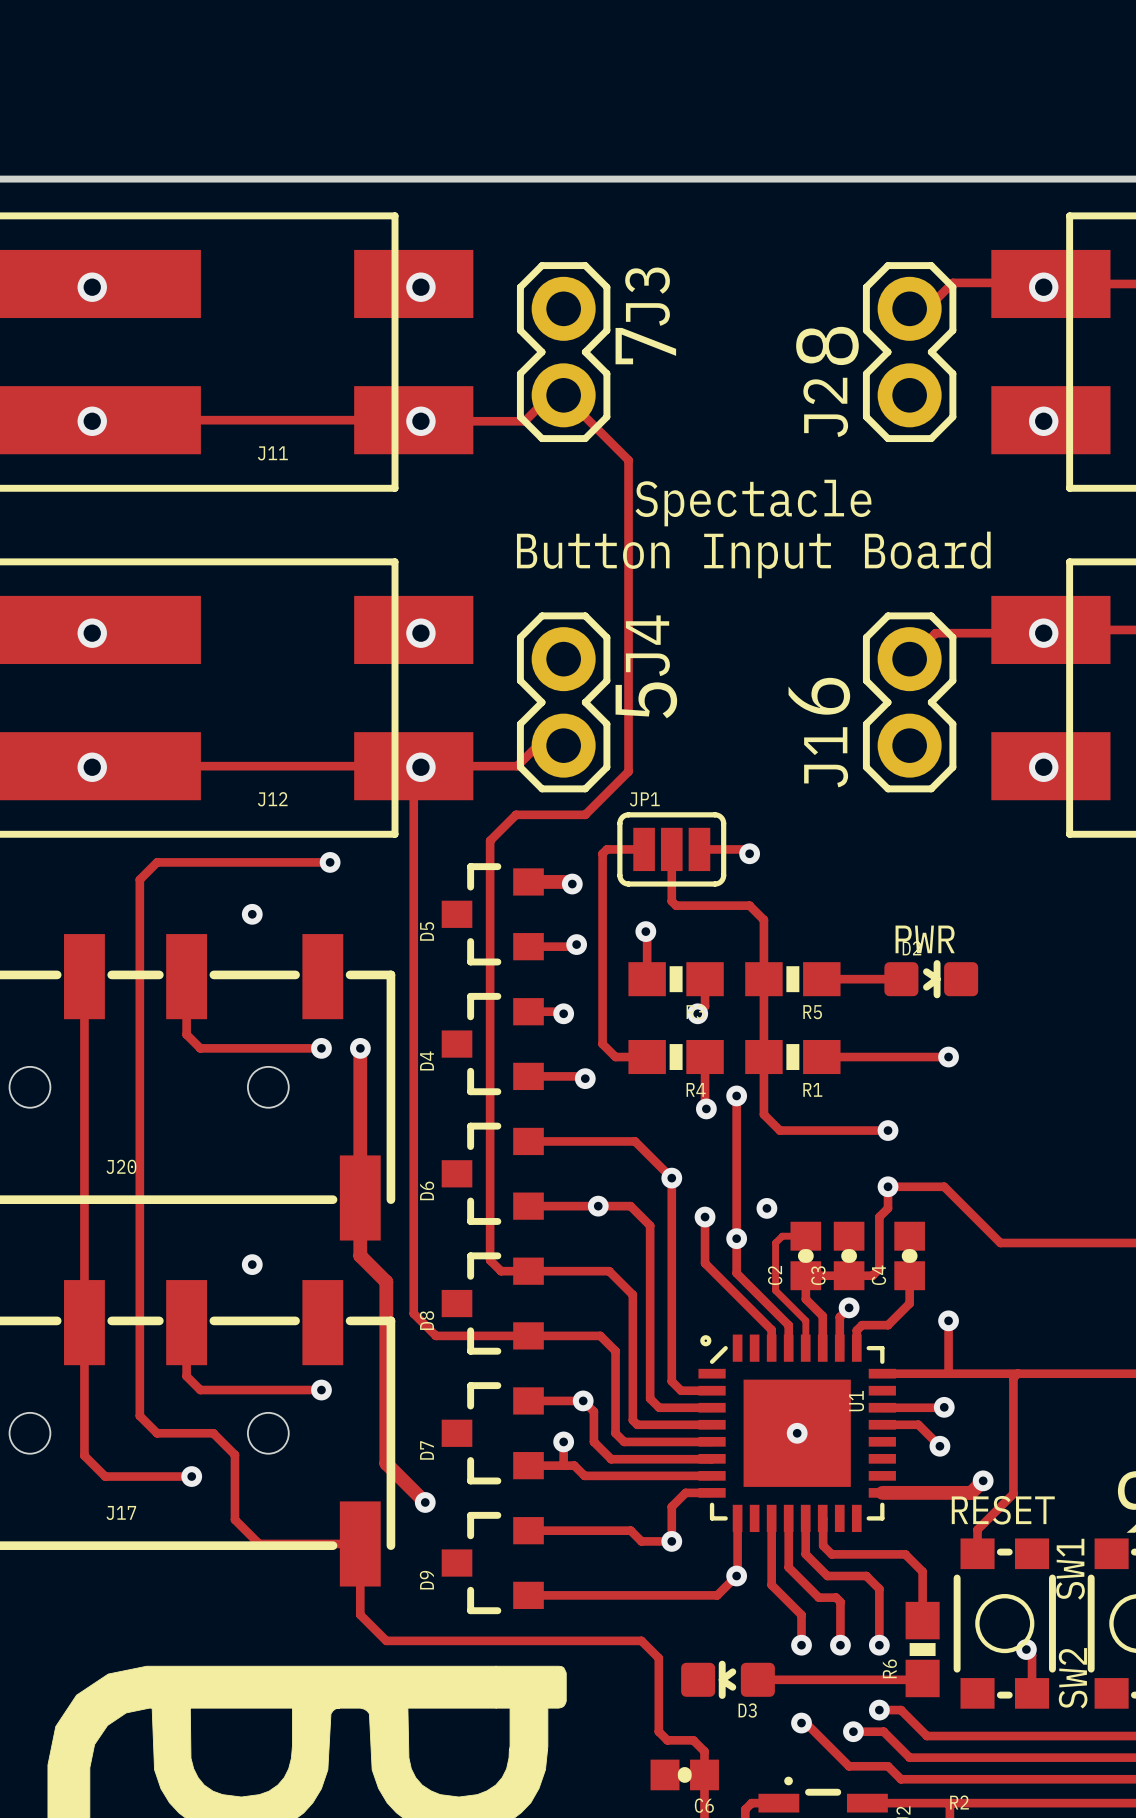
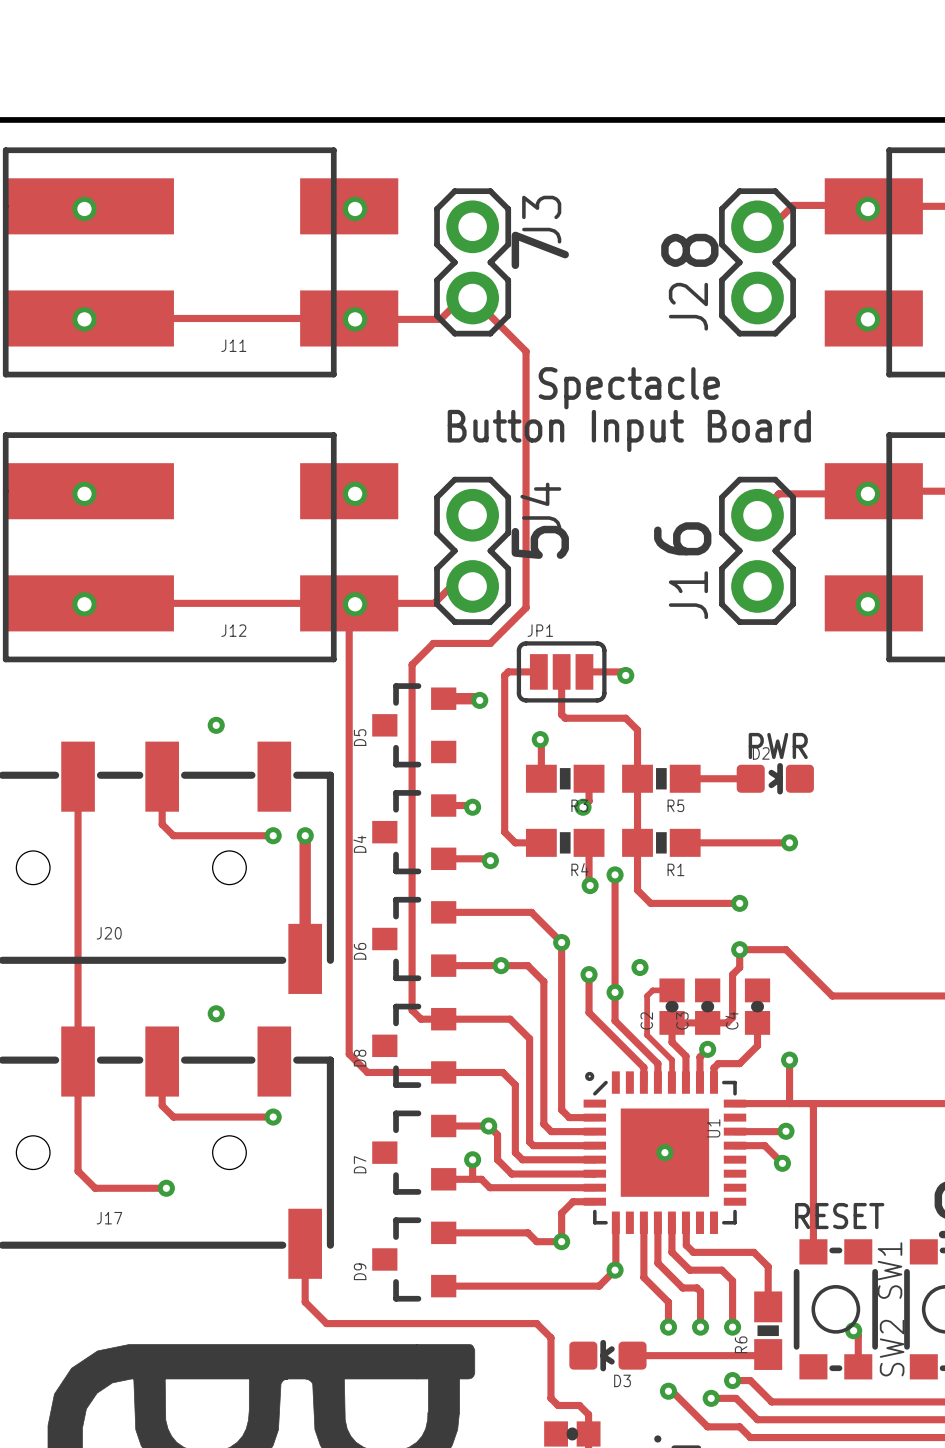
track: (330, 862) (157, 862) (139, 879) (139, 1415) (157, 1433) (213, 1433) (234, 1454) (234, 1519) (259, 1543) (360, 1543) -> none
via: (330, 862) -> none
track: (576, 944) (574, 946) (528, 946) -> none
via: (576, 944) -> none
track: (360, 1197) (360, 1255) (386, 1281) (386, 1463) (425, 1502) -> none
track: (1017, 1373) (1013, 1378) (1013, 1493) (977, 1529) -> (810, 1103) (813, 1106) (813, 1232)
track: (983, 1480) (971, 1492) (882, 1492) -> none
via: (983, 1480) -> none
via: (425, 1502) -> none

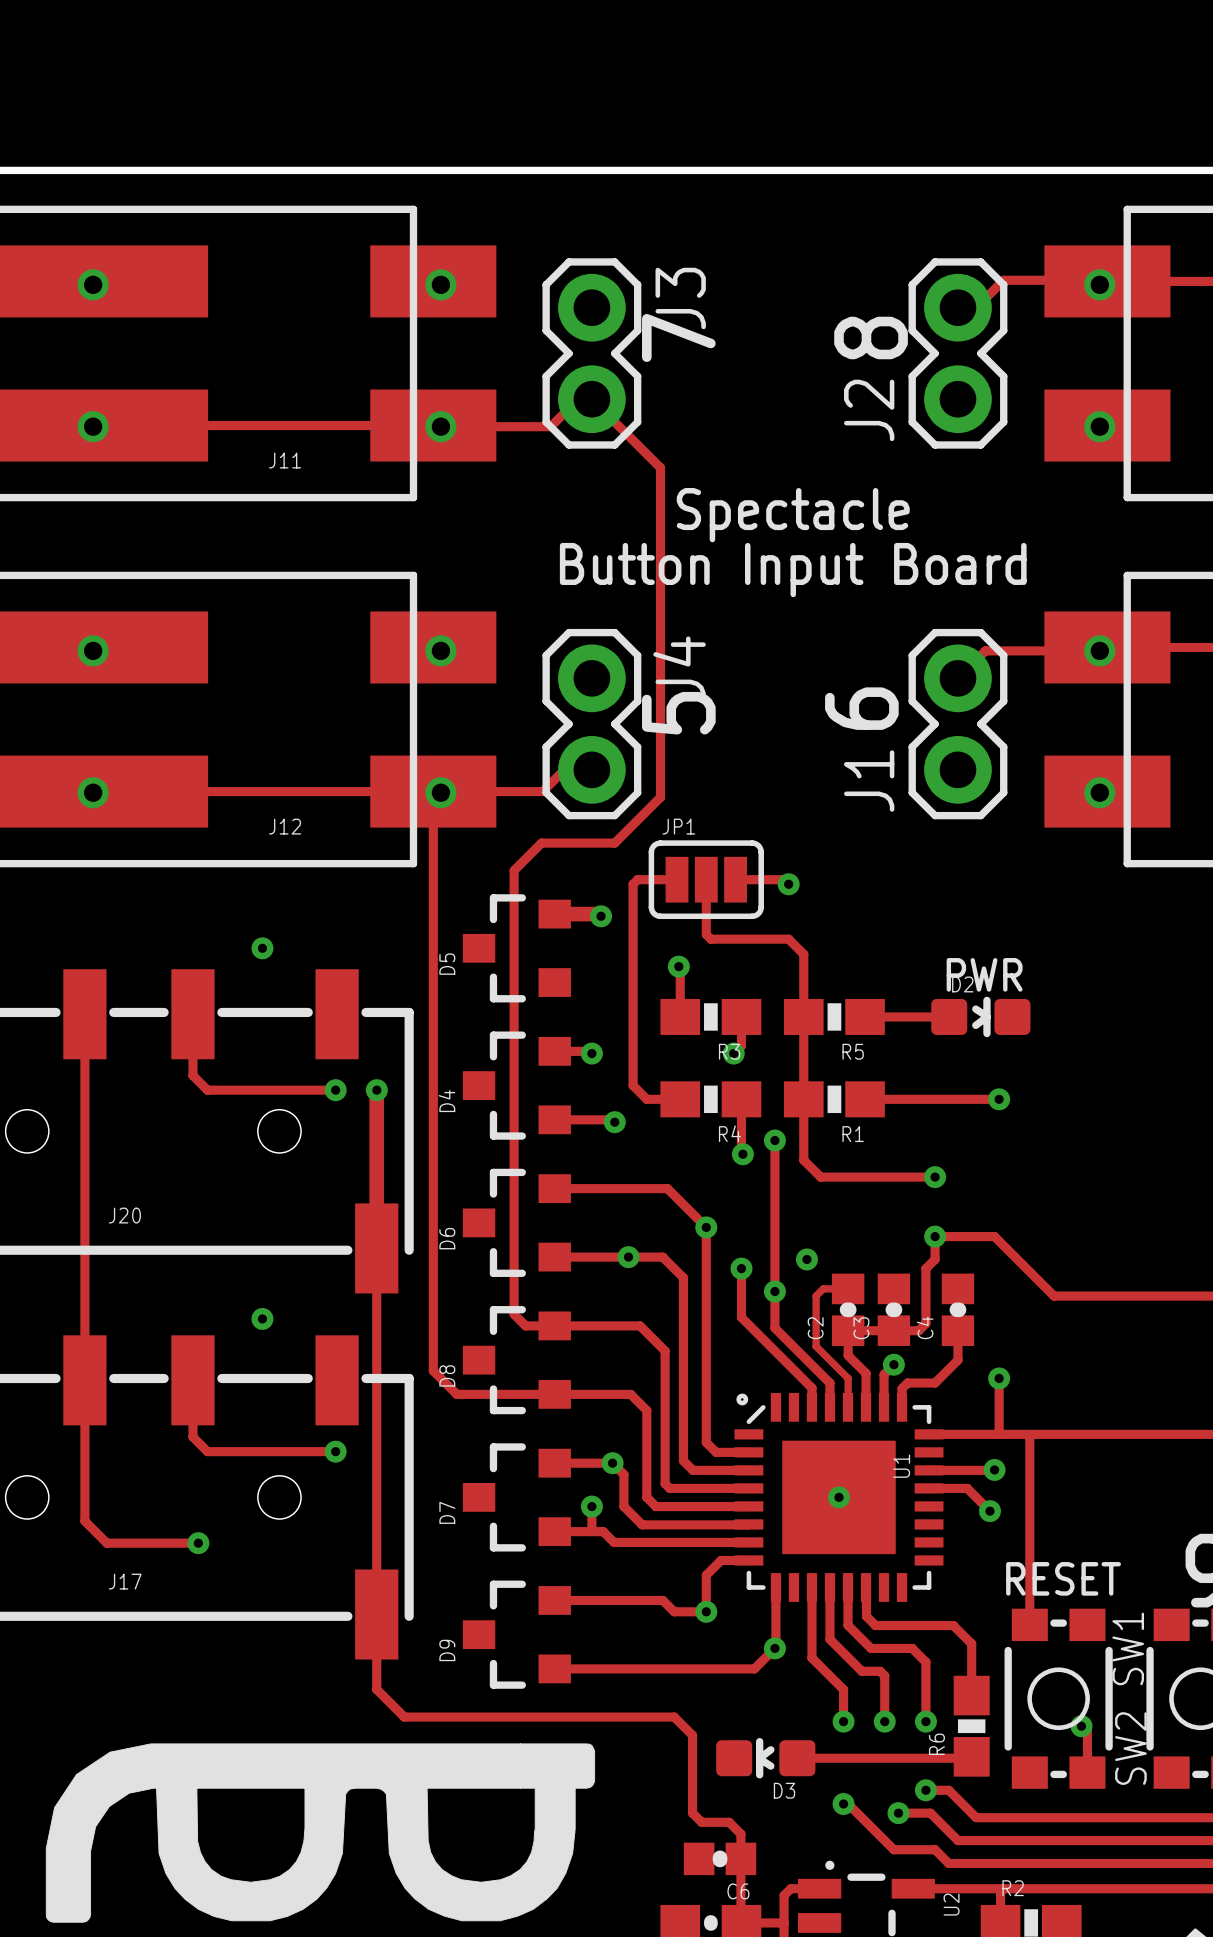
track: none -> (376, 1248) (376, 1614)

